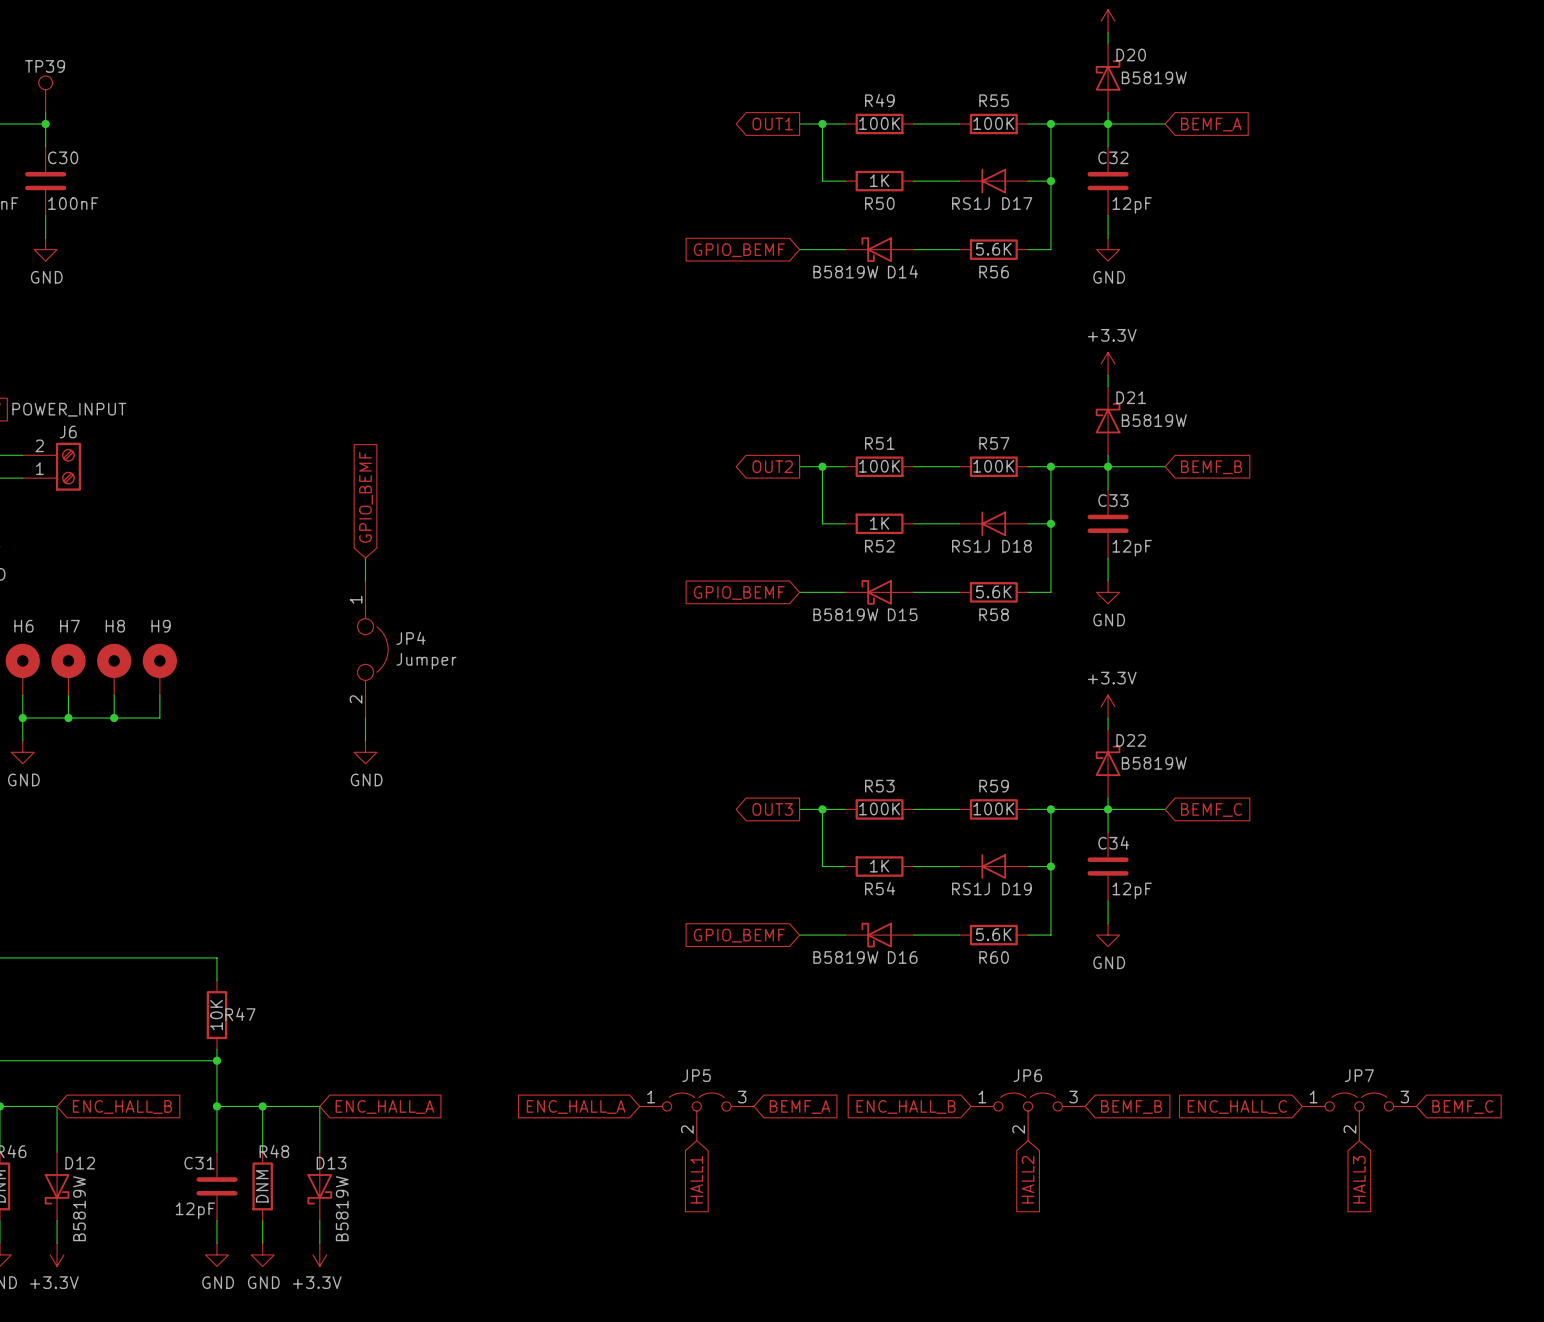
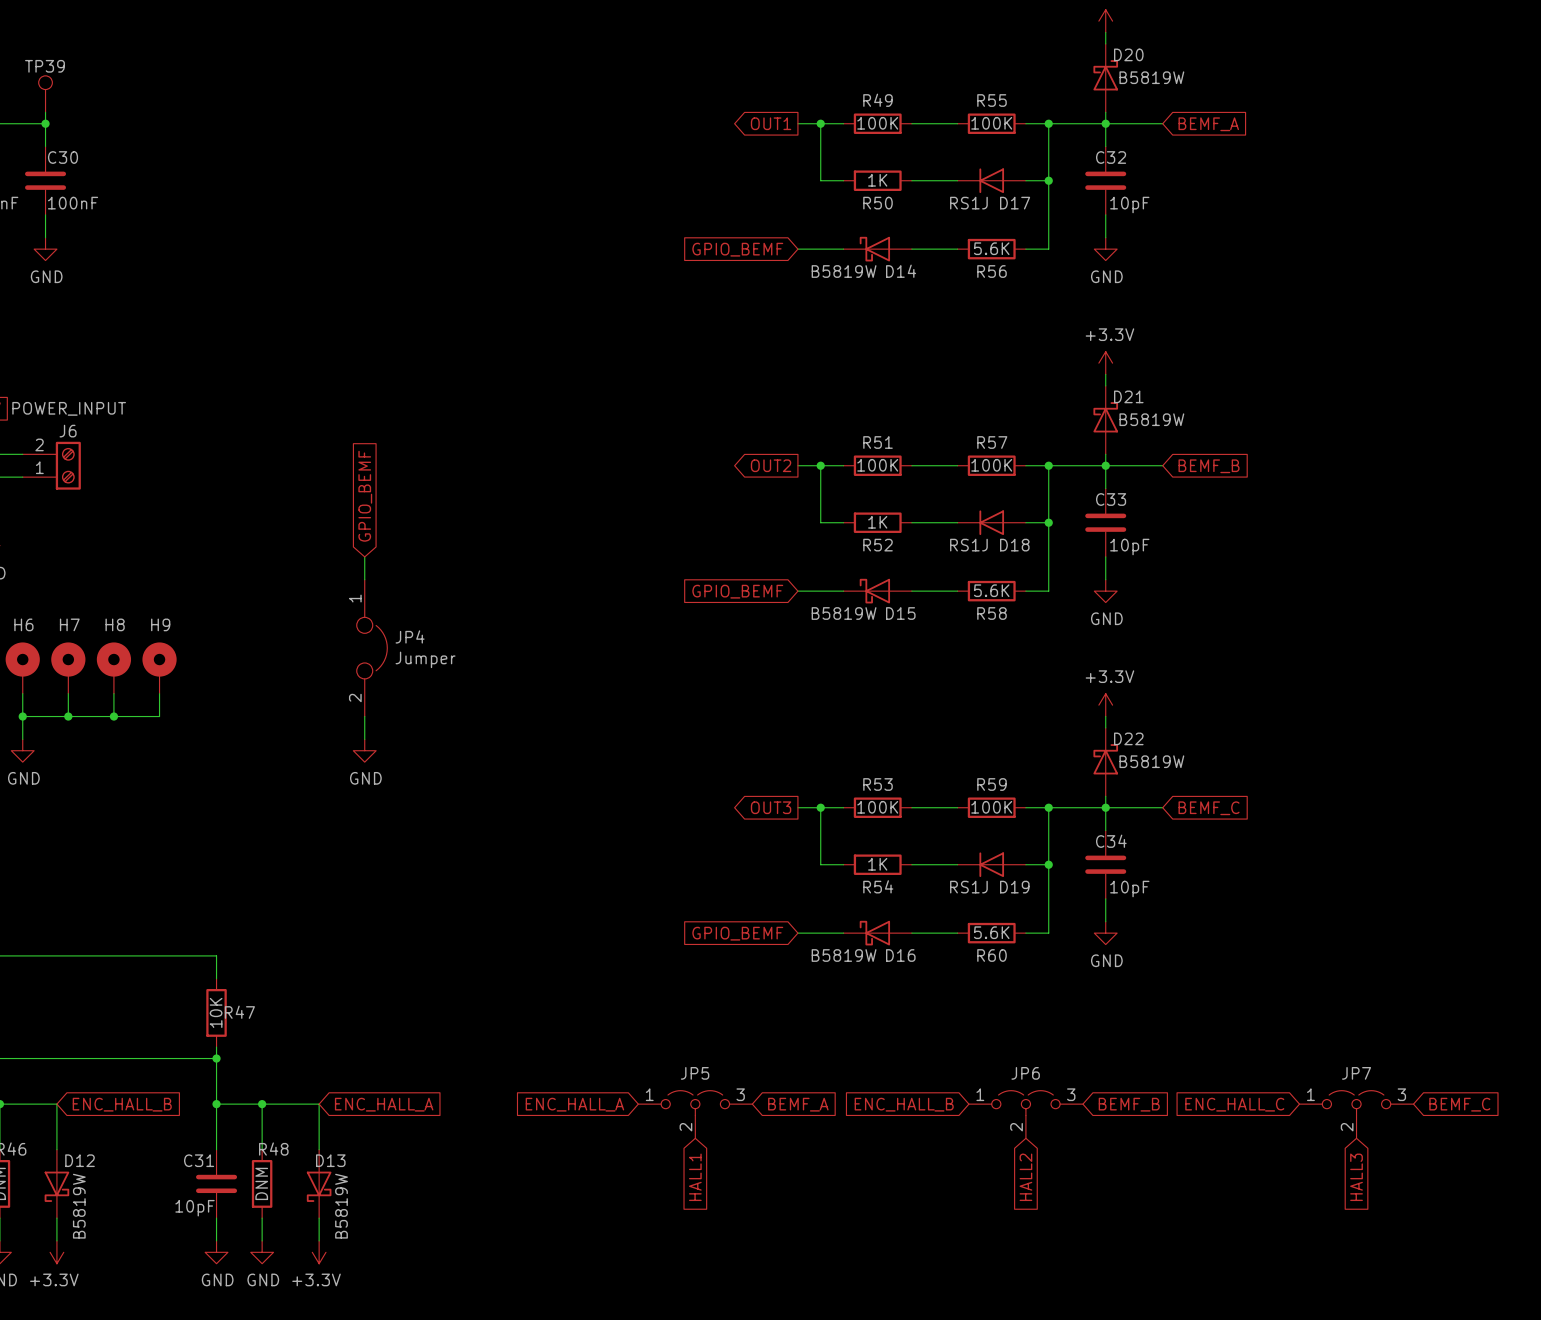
C32 value: 12pF (1132, 205) -> 10pF (1129, 205)
C33 value: 12pF (1132, 548) -> 10pF (1129, 547)
C34 value: 12pF (1132, 890) -> 10pF (1129, 889)
C31 value: 12pF (195, 1210) -> 10pF (195, 1208)

